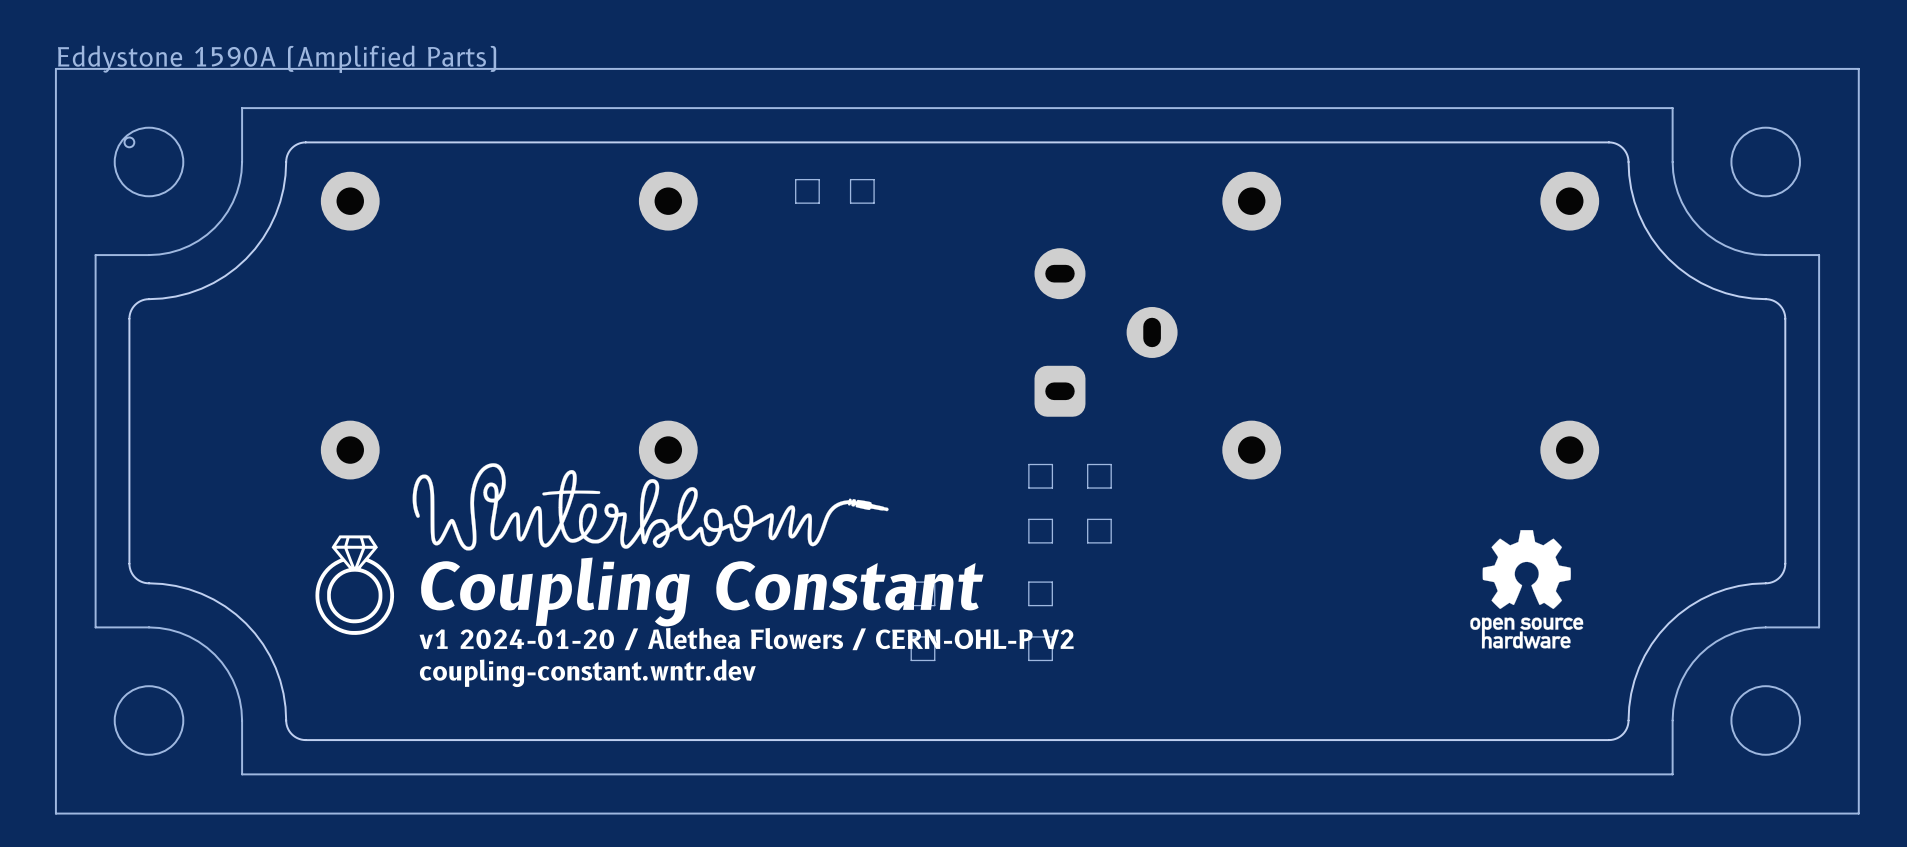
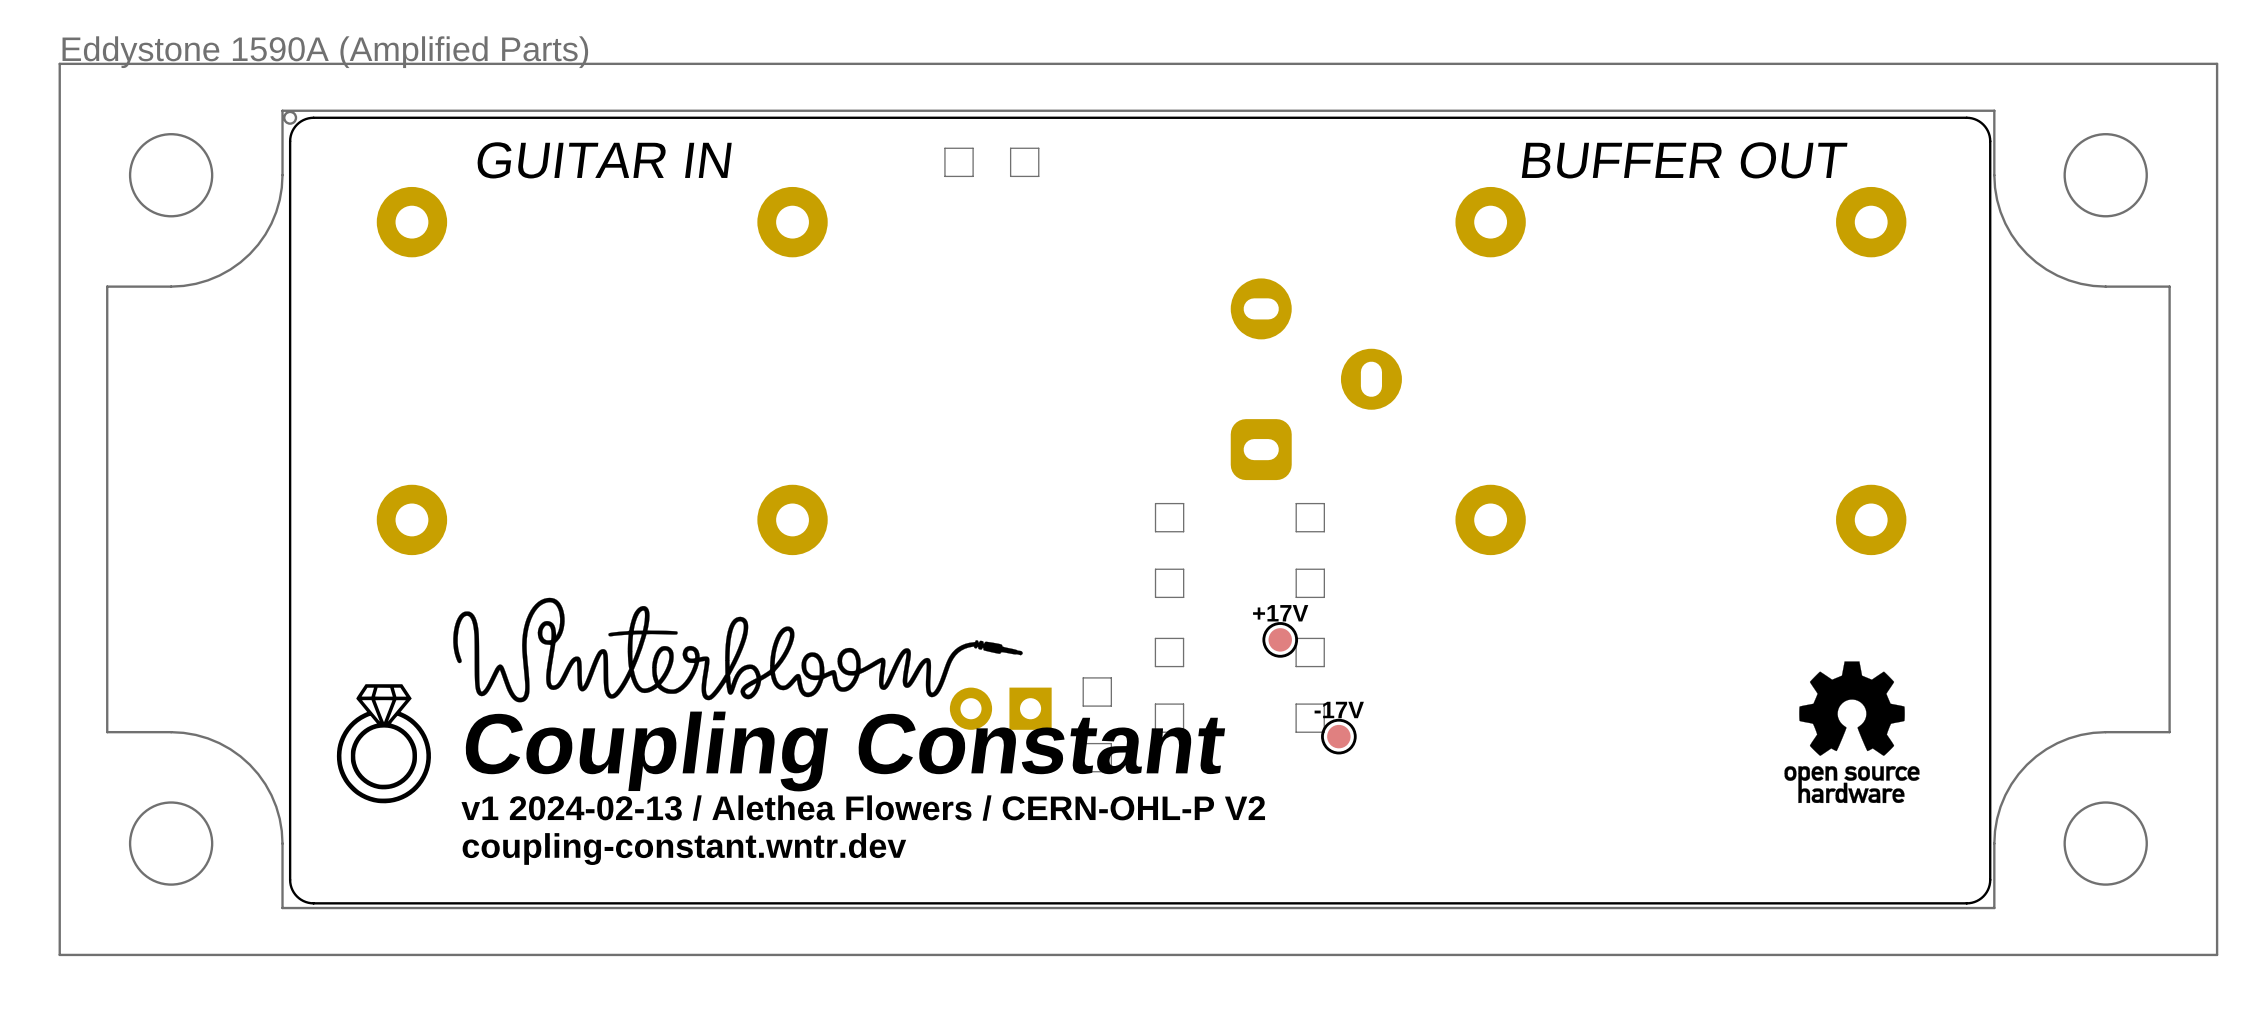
drawing position: (129, 142) -> (290, 117)
board edge: (305, 142) (1615, 143) (1622, 148) (1627, 155) (1631, 188) (1638, 214) (1651, 238) (1668, 258) (1689, 276) (1713, 288) (1738, 296) (1772, 300) (1779, 304) (1784, 312) (1784, 570) (1779, 577) (1772, 582) (1738, 585) (1713, 593) (1689, 606) (1668, 623) (1651, 644) (1638, 667) (1631, 693) (1626, 728) (1619, 737) (1611, 739) (299, 738) (291, 734) (287, 726) (283, 693) (275, 667) (263, 644) (246, 623) (225, 606) (201, 593) (175, 585) (142, 582) (135, 577) (130, 570) (129, 318) (132, 308) (140, 301) (175, 296) (201, 288) (225, 276) (246, 258) (263, 238) (275, 214) (283, 188) (288, 153) (295, 145) (305, 142) -> (313, 117) (305, 119) (297, 124) (292, 131) (290, 141) (290, 879) (293, 892) (303, 901) (313, 903) (1966, 903) (1979, 899) (1987, 890) (1990, 879) (1990, 141) (1986, 128) (1976, 120) (1966, 117) (313, 117)
text: none -> GUITAR IN (604, 160)
text: none -> BUFFER OUT (1684, 160)
part position: (834, 191) -> (991, 162)
part: none -> (1169, 550)
part: (1040, 503) -> none
part position: (1099, 503) -> (1310, 550)
drawing position: (650, 506) -> (737, 650)
part: none -> +17V (1280, 639)
drawing position: (354, 585) -> (383, 743)
part: none -> (1169, 685)
part: none -> (1310, 685)
drawing position: (1526, 589) -> (1852, 732)
text position: Coupling Constant (702, 592) -> Coupling Constant (844, 751)
part: none -> (1000, 708)
part: (1040, 621) -> none
part: none -> -17V (1338, 736)
text: v1 2024-01-20 / Alethea Flowers / CERN-OHL-P V2 (746, 639) -> none
text position: coupling-constant.wntr.dev (587, 673) -> coupling-constant.wntr.dev (684, 849)
text: none -> v1 2024-02-13 / Alethea Flowers / CERN-OHL-P V2 (863, 808)

